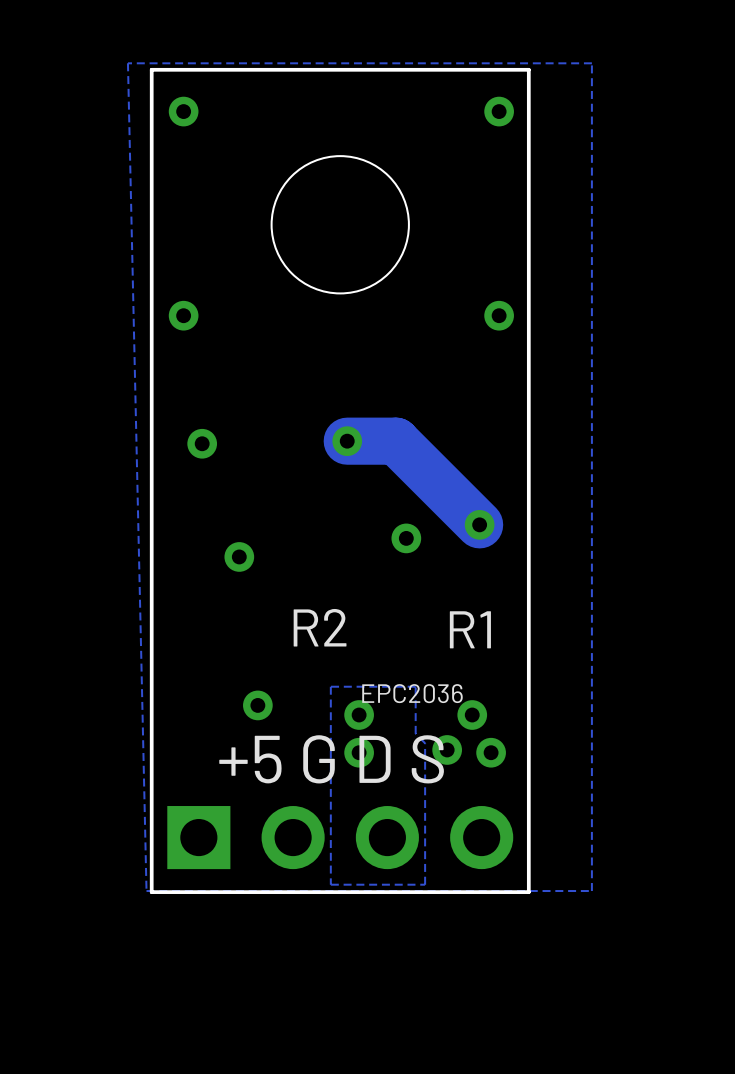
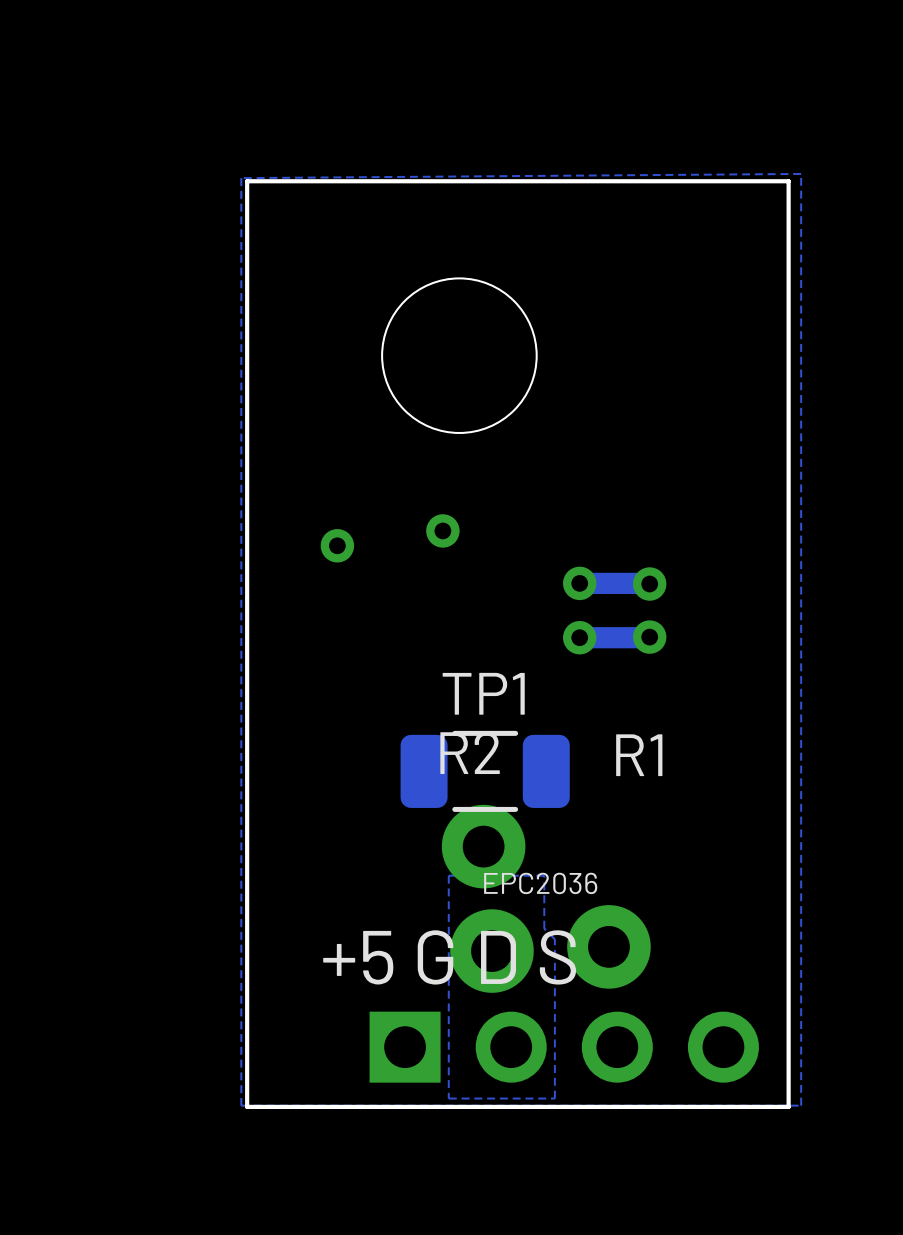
board edge: (528, 69) (528, 892) -> (671, 181) (788, 181) (788, 1106) (671, 1106)
via: (183, 111) -> none
via: (499, 111) -> none
via: (183, 315) -> none
via: (499, 315) -> none
via: none -> (442, 530)
via: none -> (337, 545)
track: none -> (579, 583) (649, 584)
via: none -> (579, 583)
via: none -> (649, 584)
track: (347, 441) (395, 441) (479, 524) -> none
via: (347, 441) -> none
via: (202, 443) -> none
track: none -> (649, 637) (579, 637)
via: none -> (649, 637)
via: none -> (579, 637)
via: (479, 524) -> none
via: (406, 538) -> none
via: (239, 556) -> none
TP1: none -> (485, 771)
R2 position: (320, 627) -> (470, 752)
R1 position: (470, 629) -> (639, 755)
part: none -> (483, 846)
via: (257, 705) -> none
via: (359, 715) -> none
via: (472, 715) -> none
via: (447, 749) -> none
part: none -> (608, 946)
via: (359, 752) -> none
via: (491, 752) -> none
part: none -> (491, 951)
part position: (340, 837) -> (564, 1047)
zone outline: (591, 891) (591, 63) (127, 63) (146, 891) -> (742, 1105) (801, 1105) (801, 173) (241, 178) (241, 1105)

